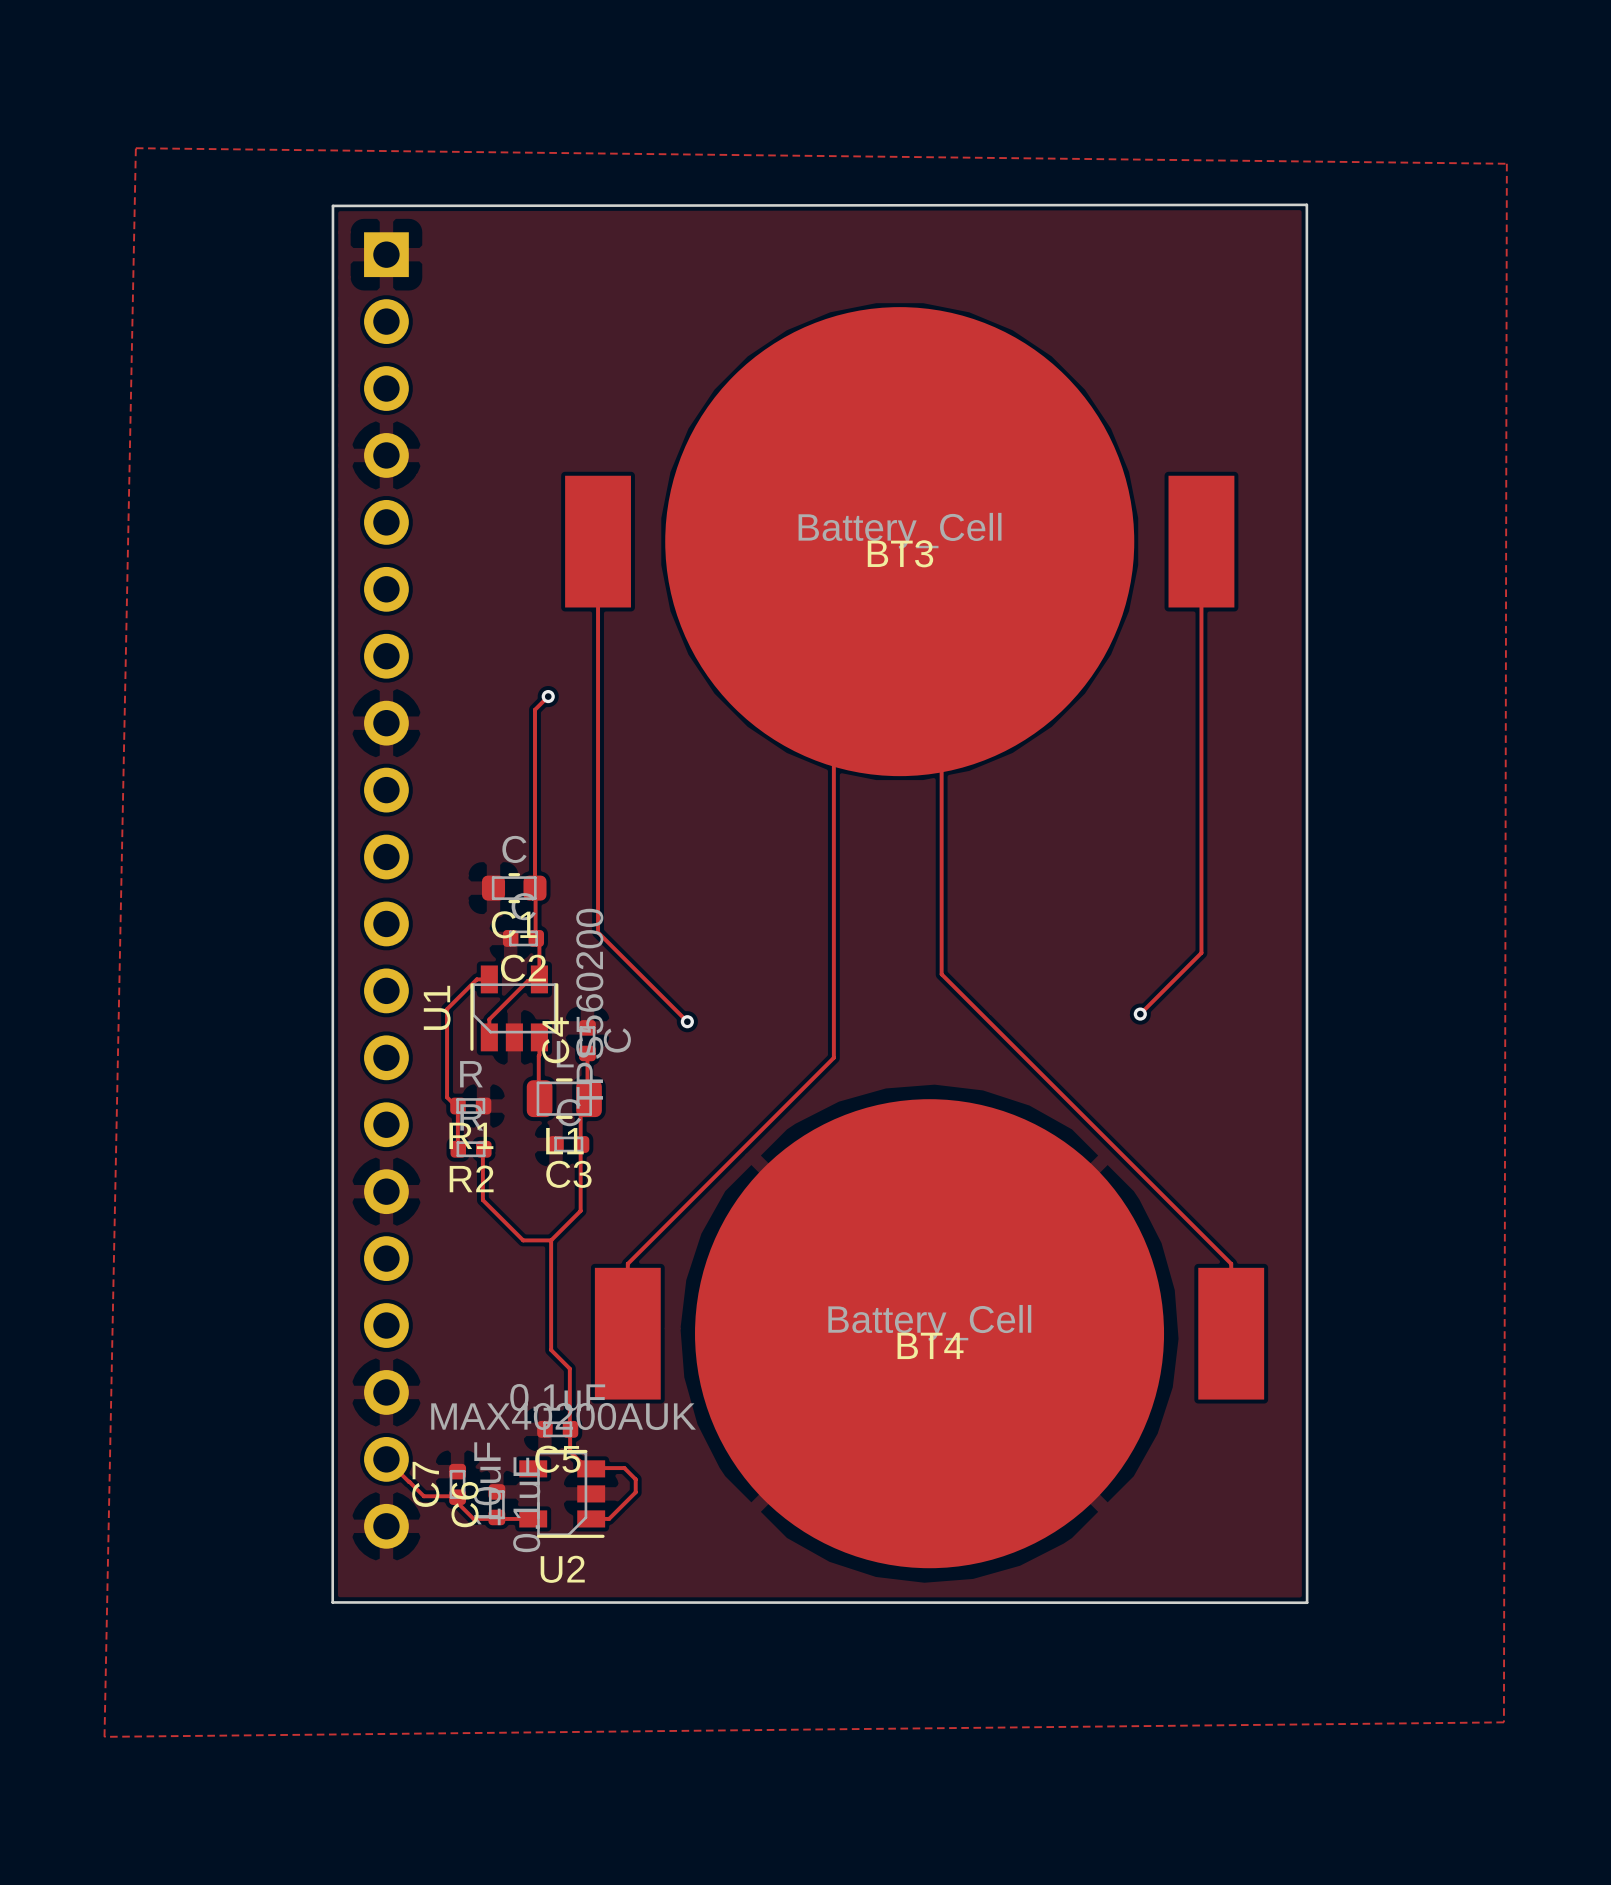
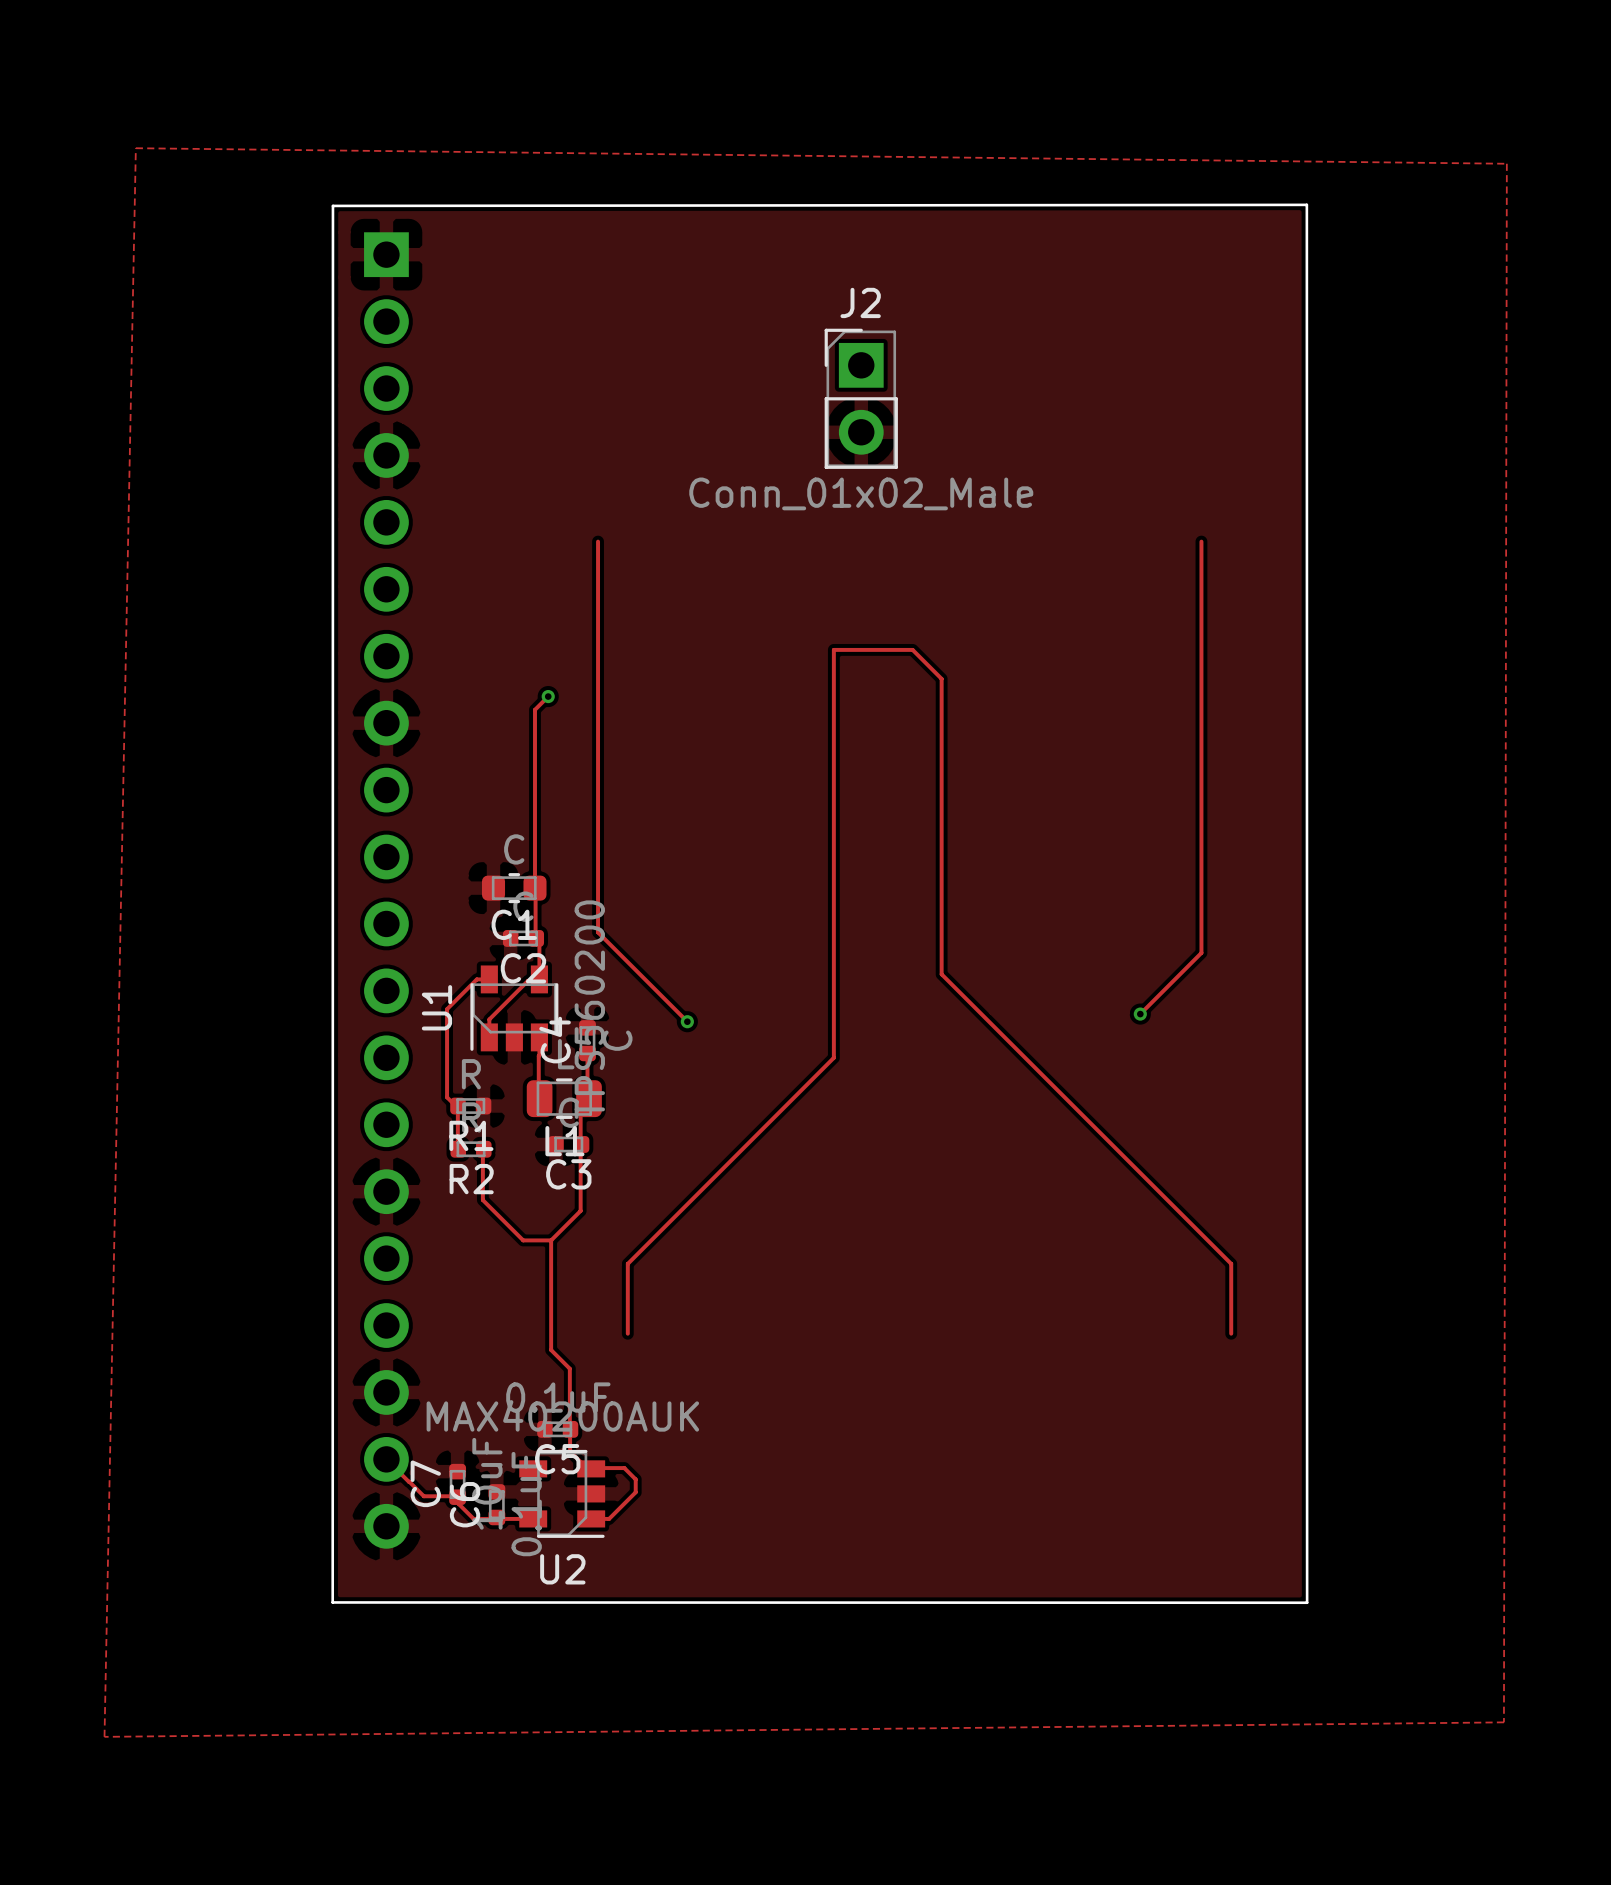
J2: none -> Conn_01x02_Male (861, 398)
BT3: Battery_Cell (899, 541) -> none
track: none -> (833, 649) (912, 649) (941, 678)
BT4: Battery_Cell (929, 1333) -> none

